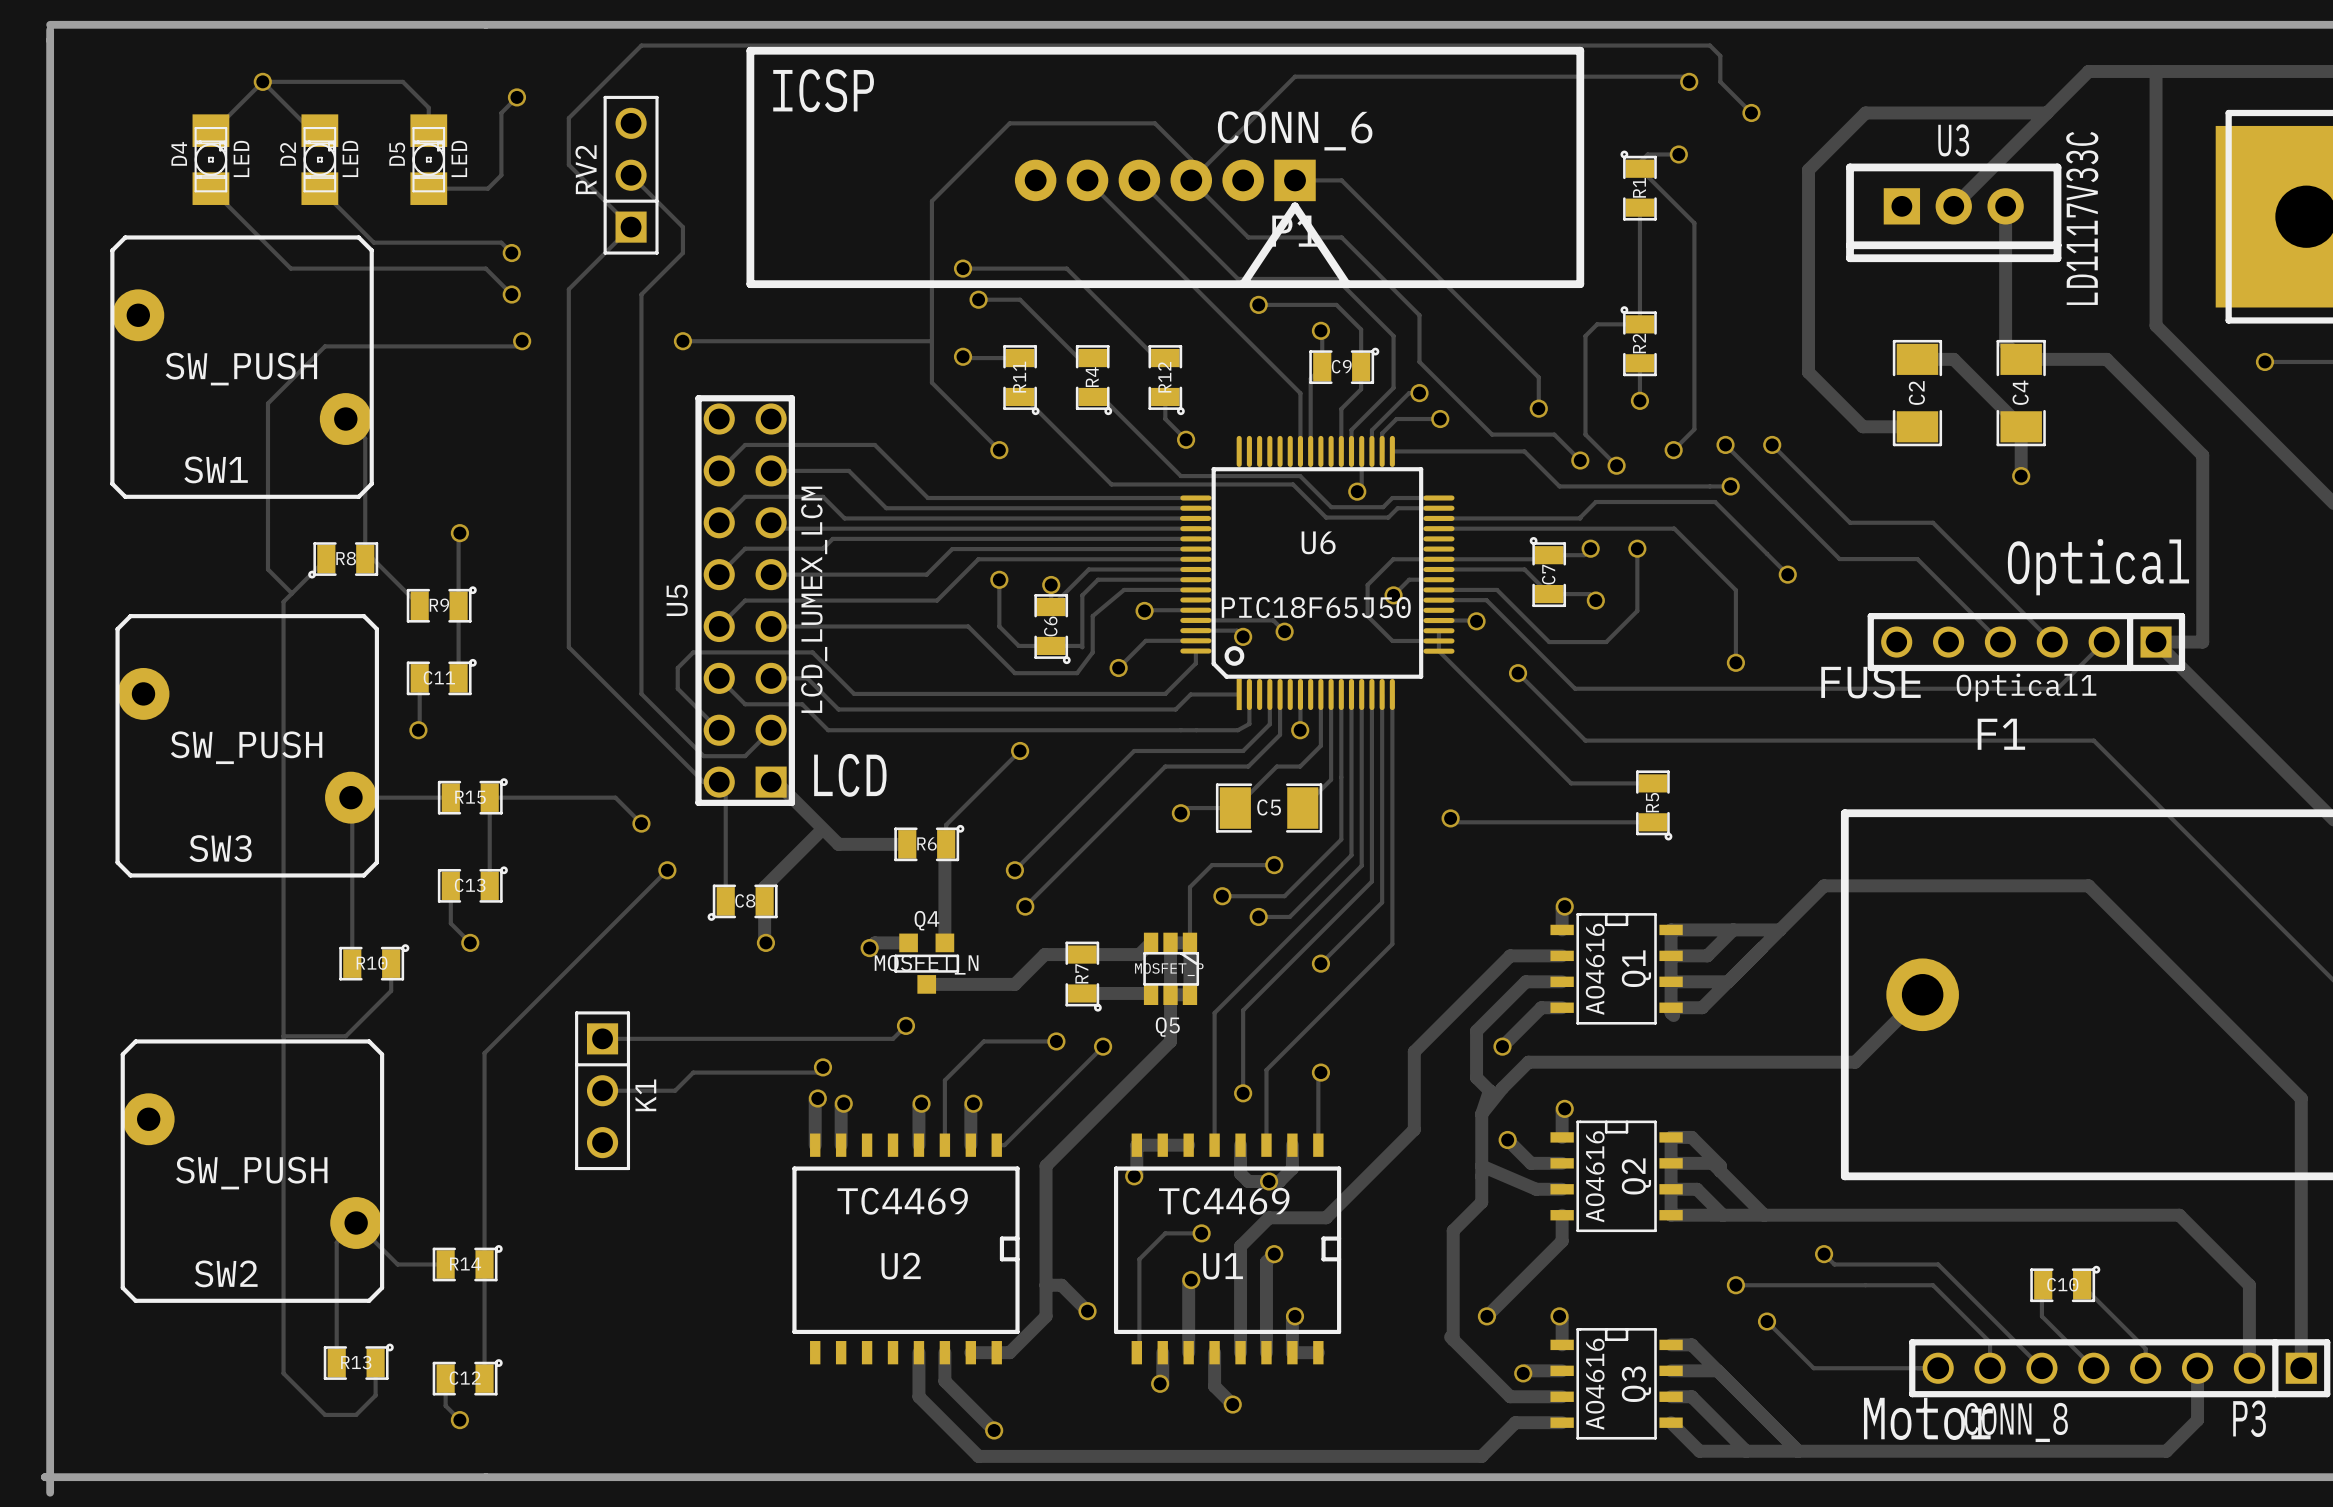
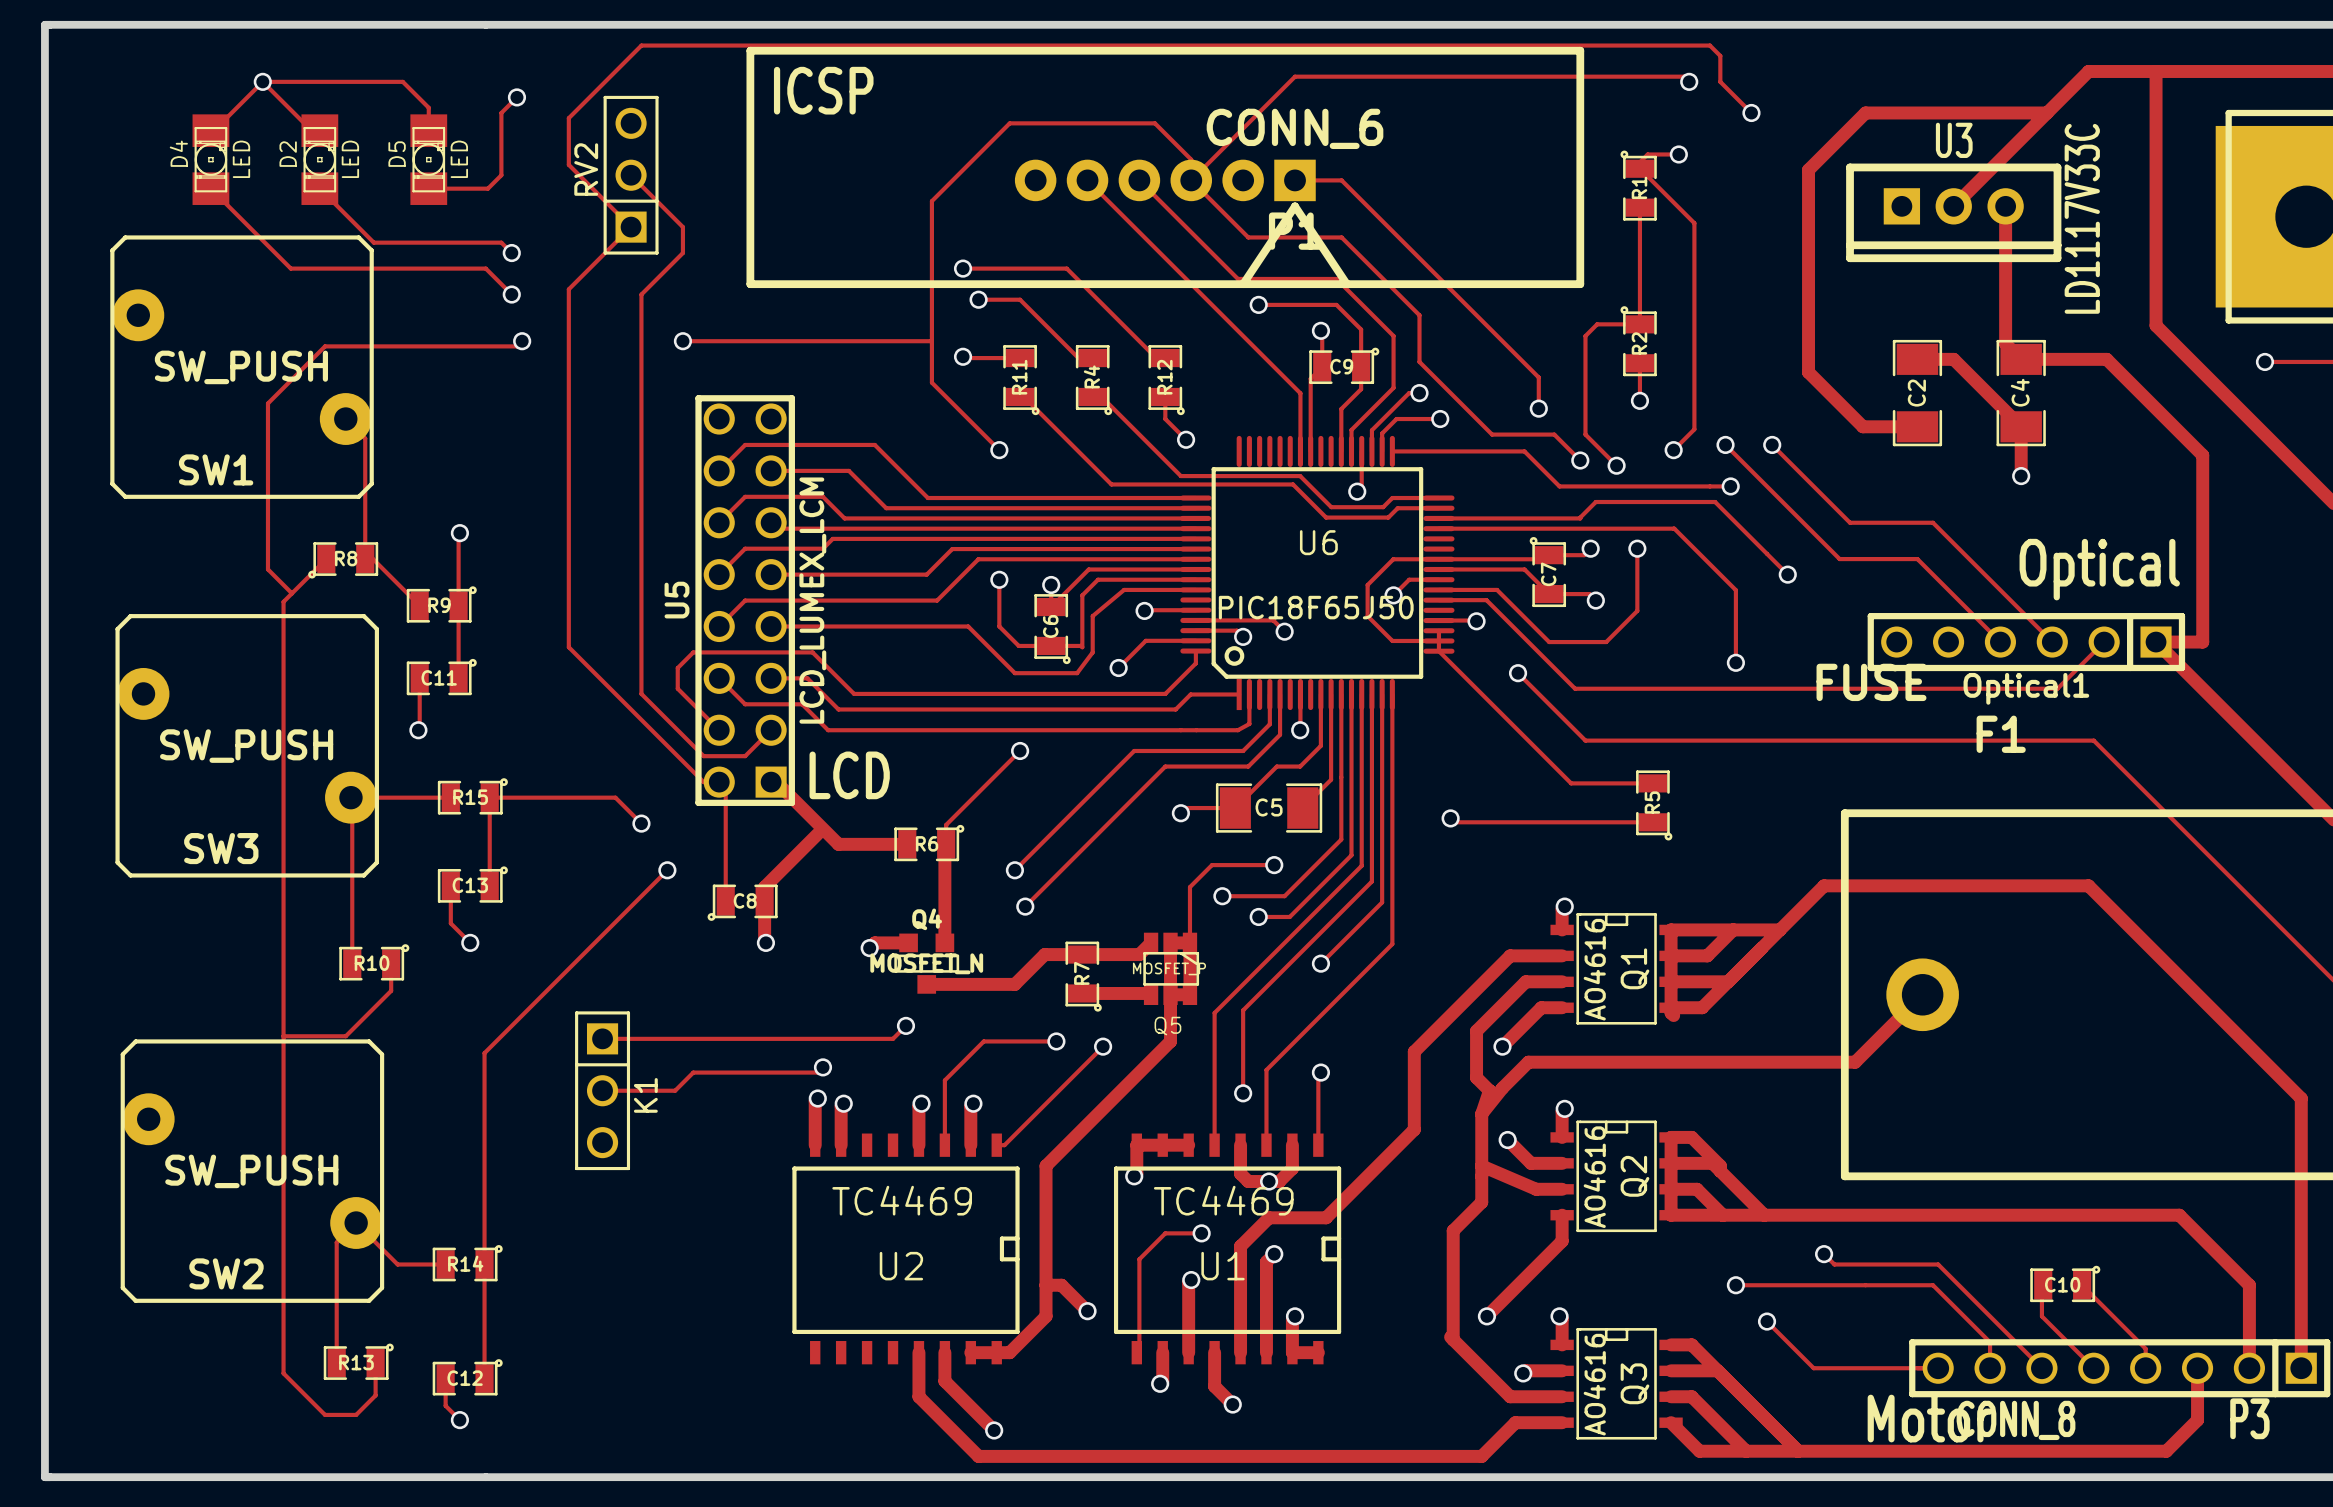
board edge: none -> (50, 24) (44, 24) (44, 1477)
board edge: (50, 29) (50, 1492) -> none

